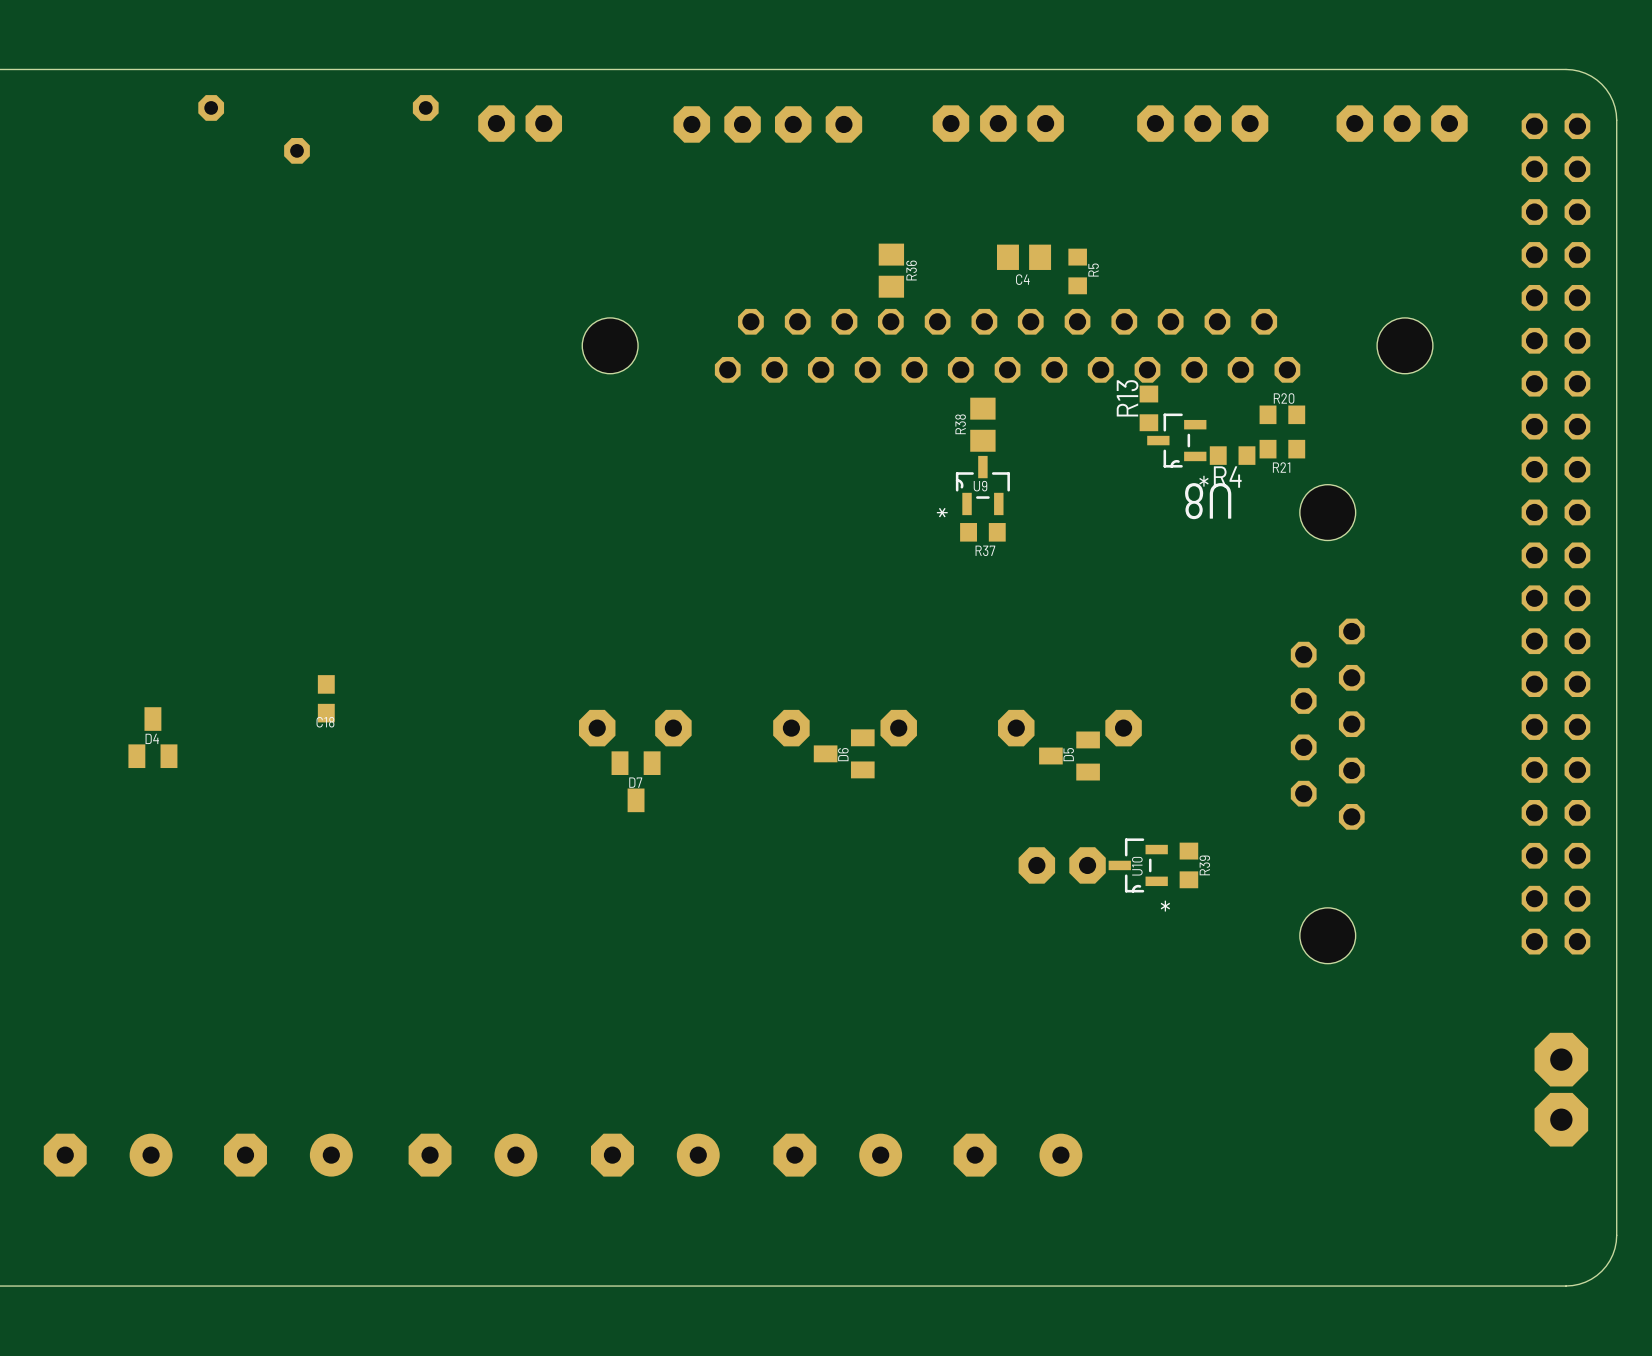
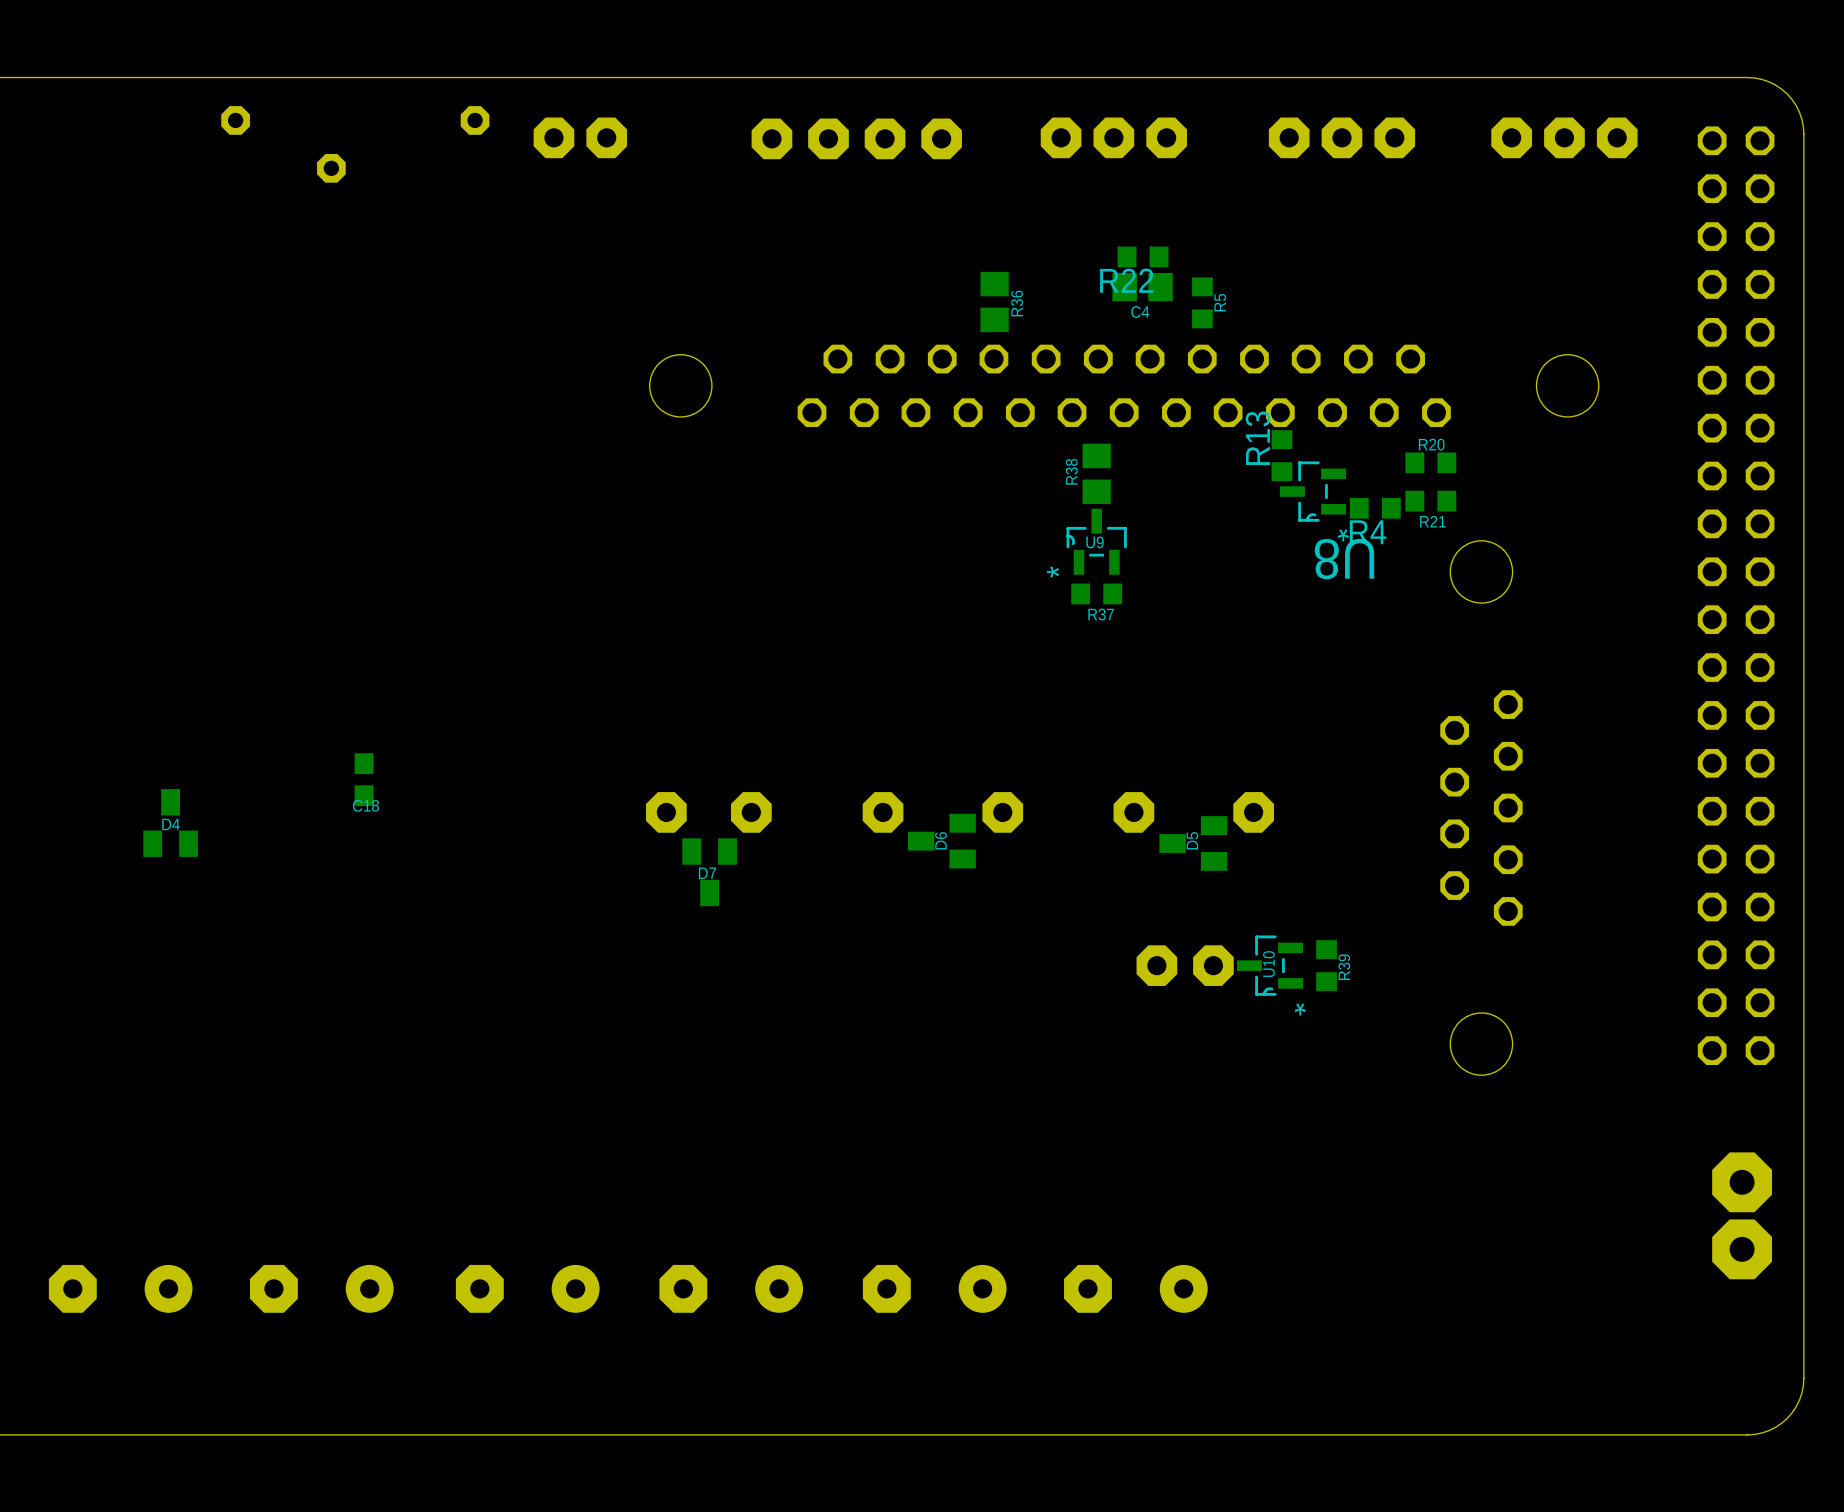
R22: none -> (1143, 256)

